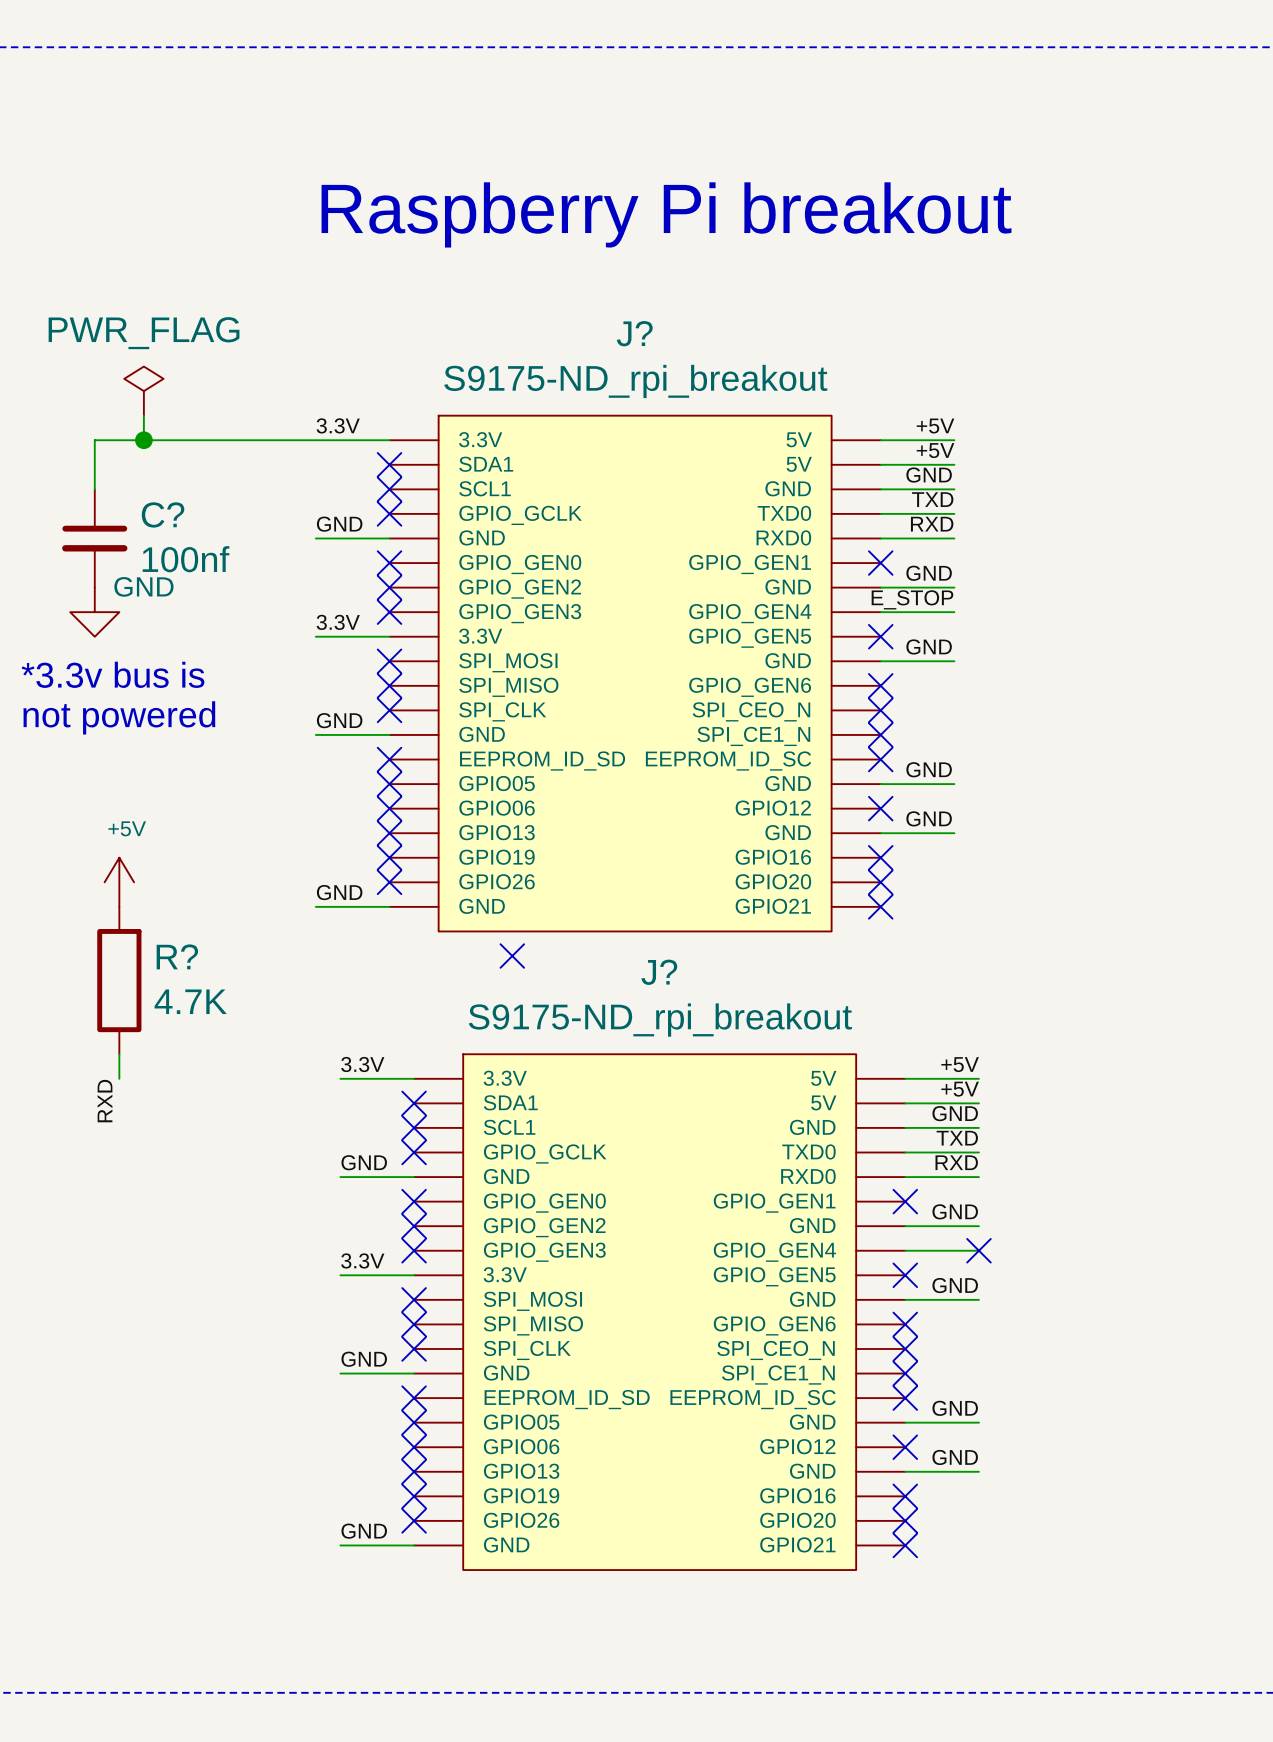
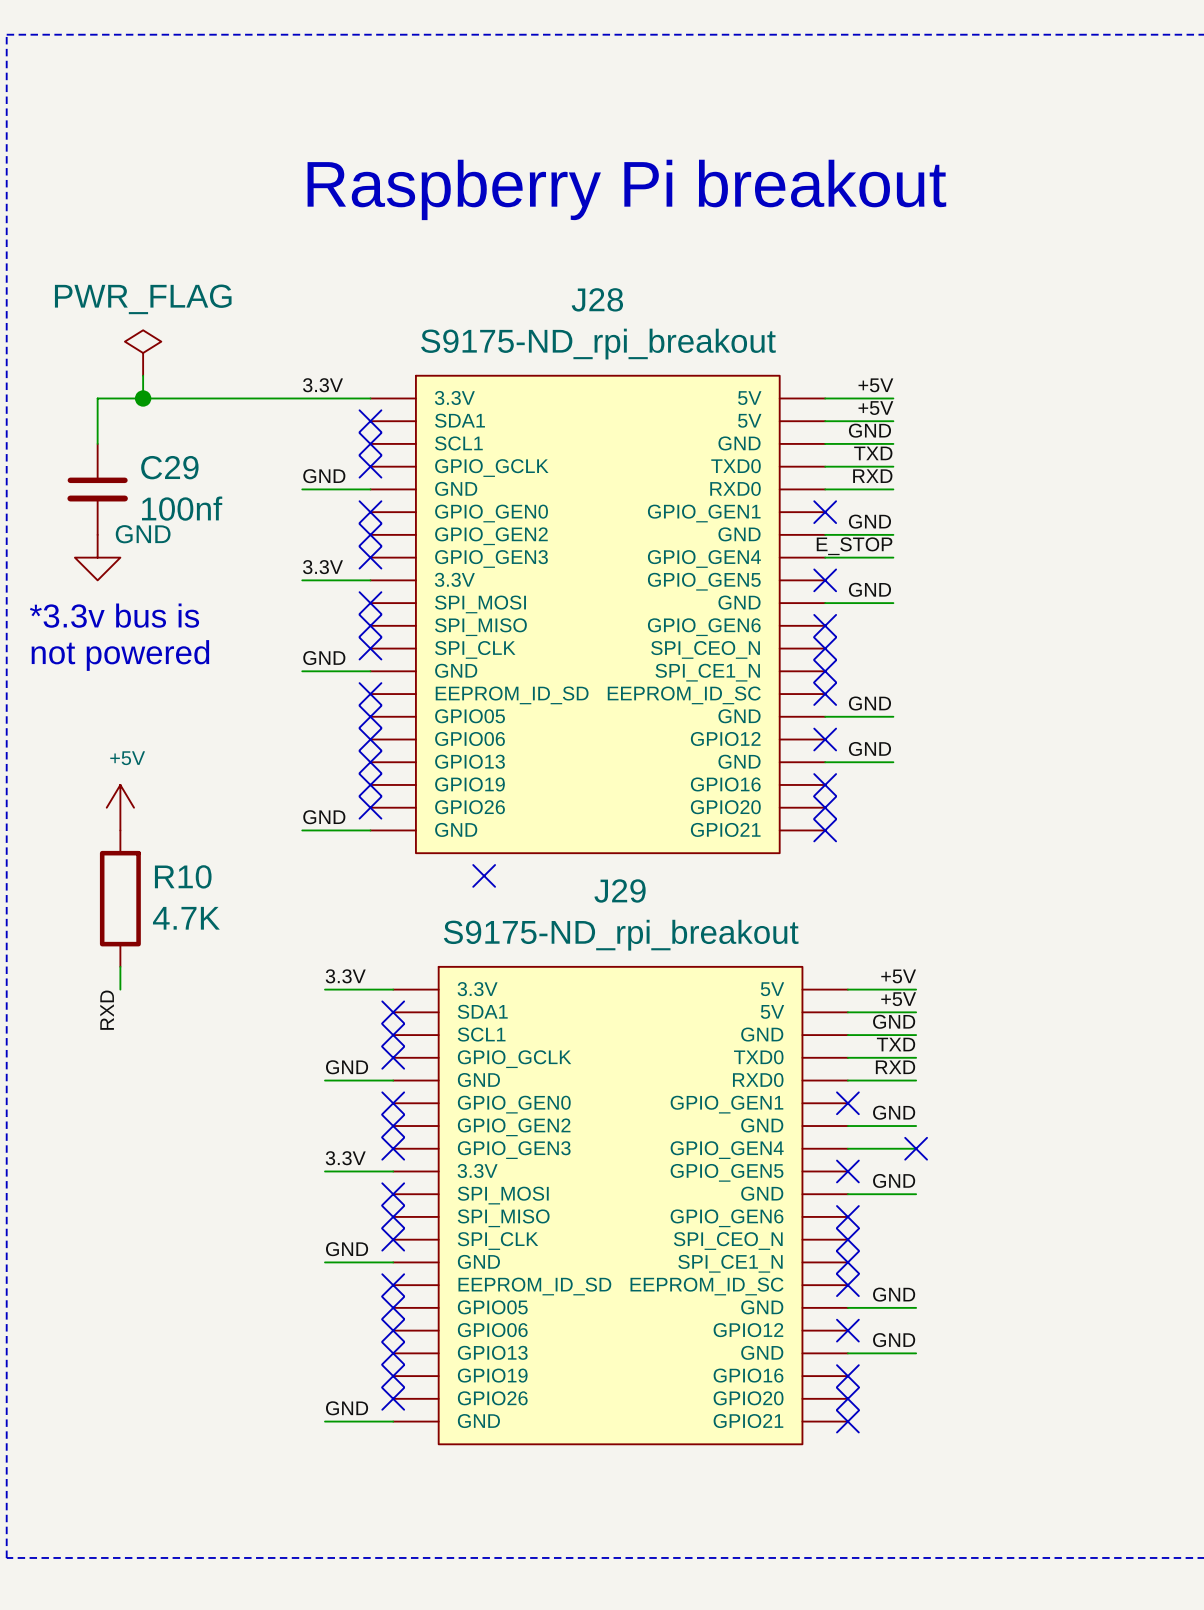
J? name: J? (634, 333) -> J28 (597, 299)
C? name: C? (163, 514) -> C29 (169, 467)
R? name: R? (177, 956) -> R10 (183, 876)
J? name: J? (659, 972) -> J29 (620, 890)

